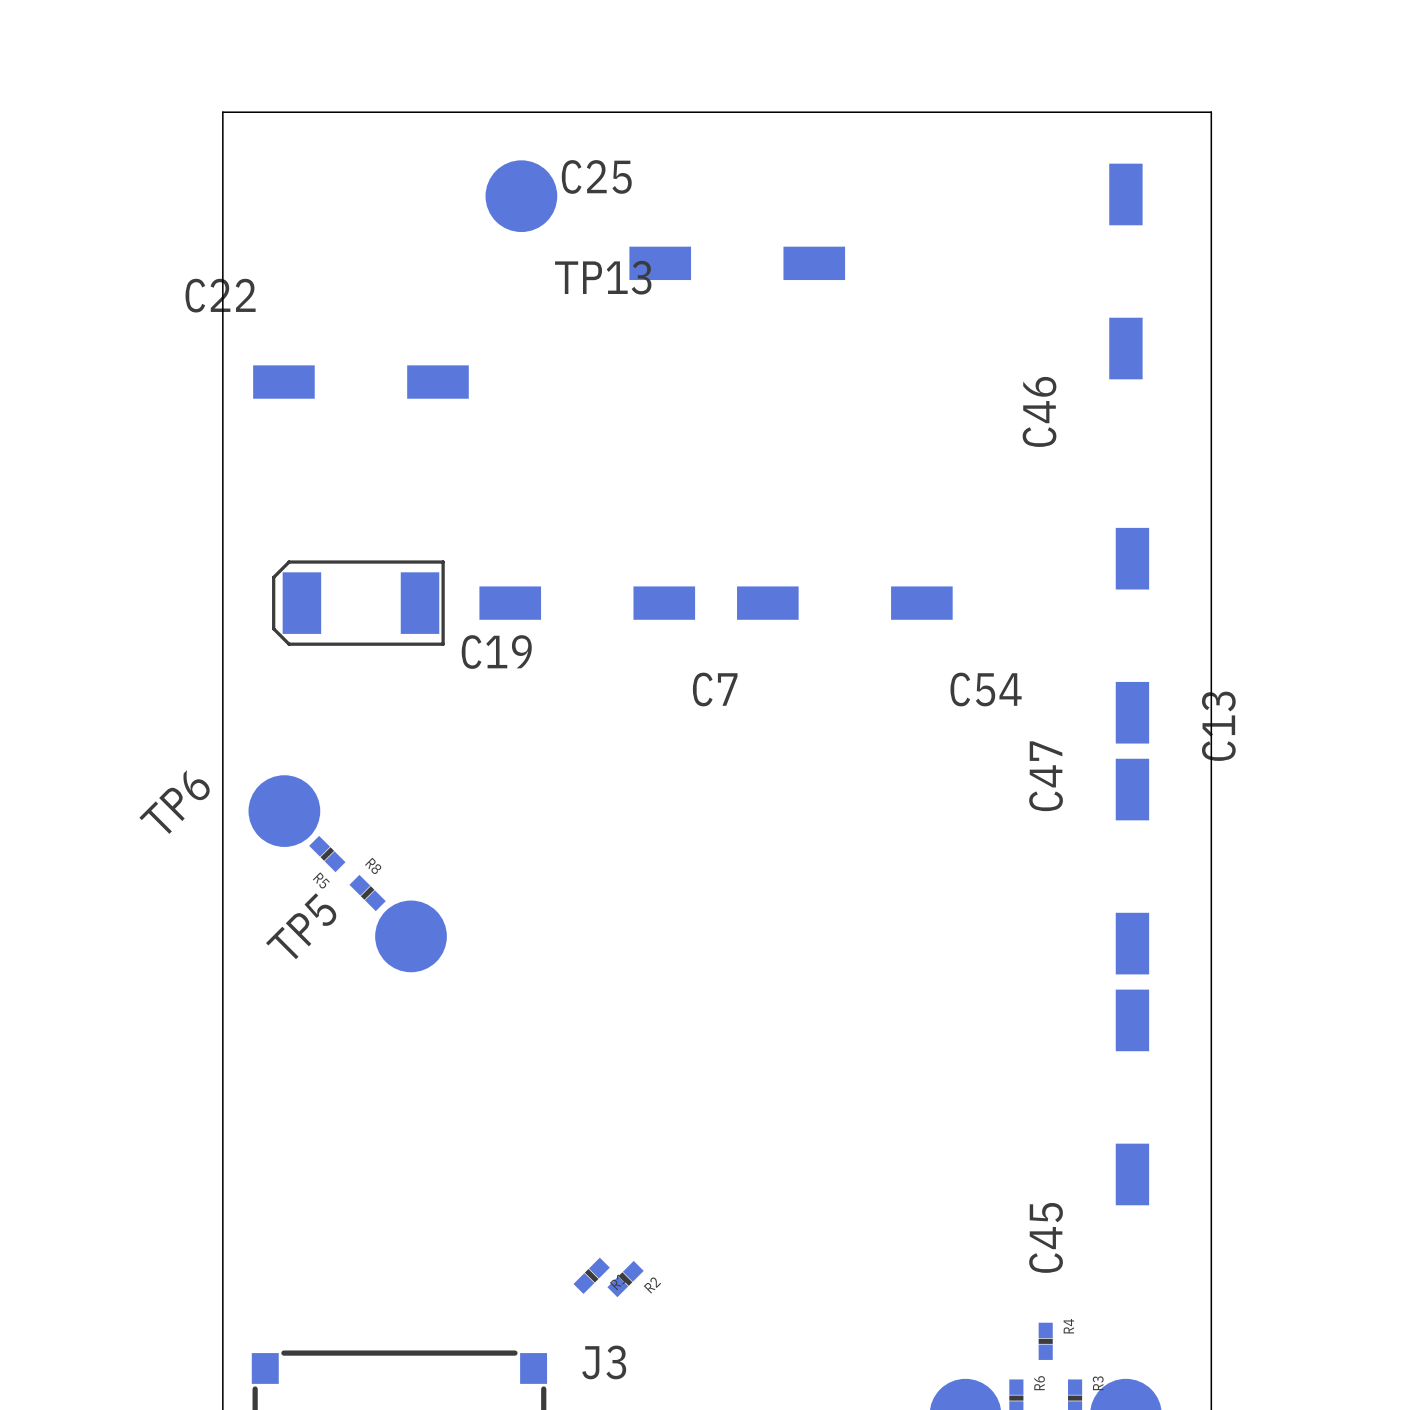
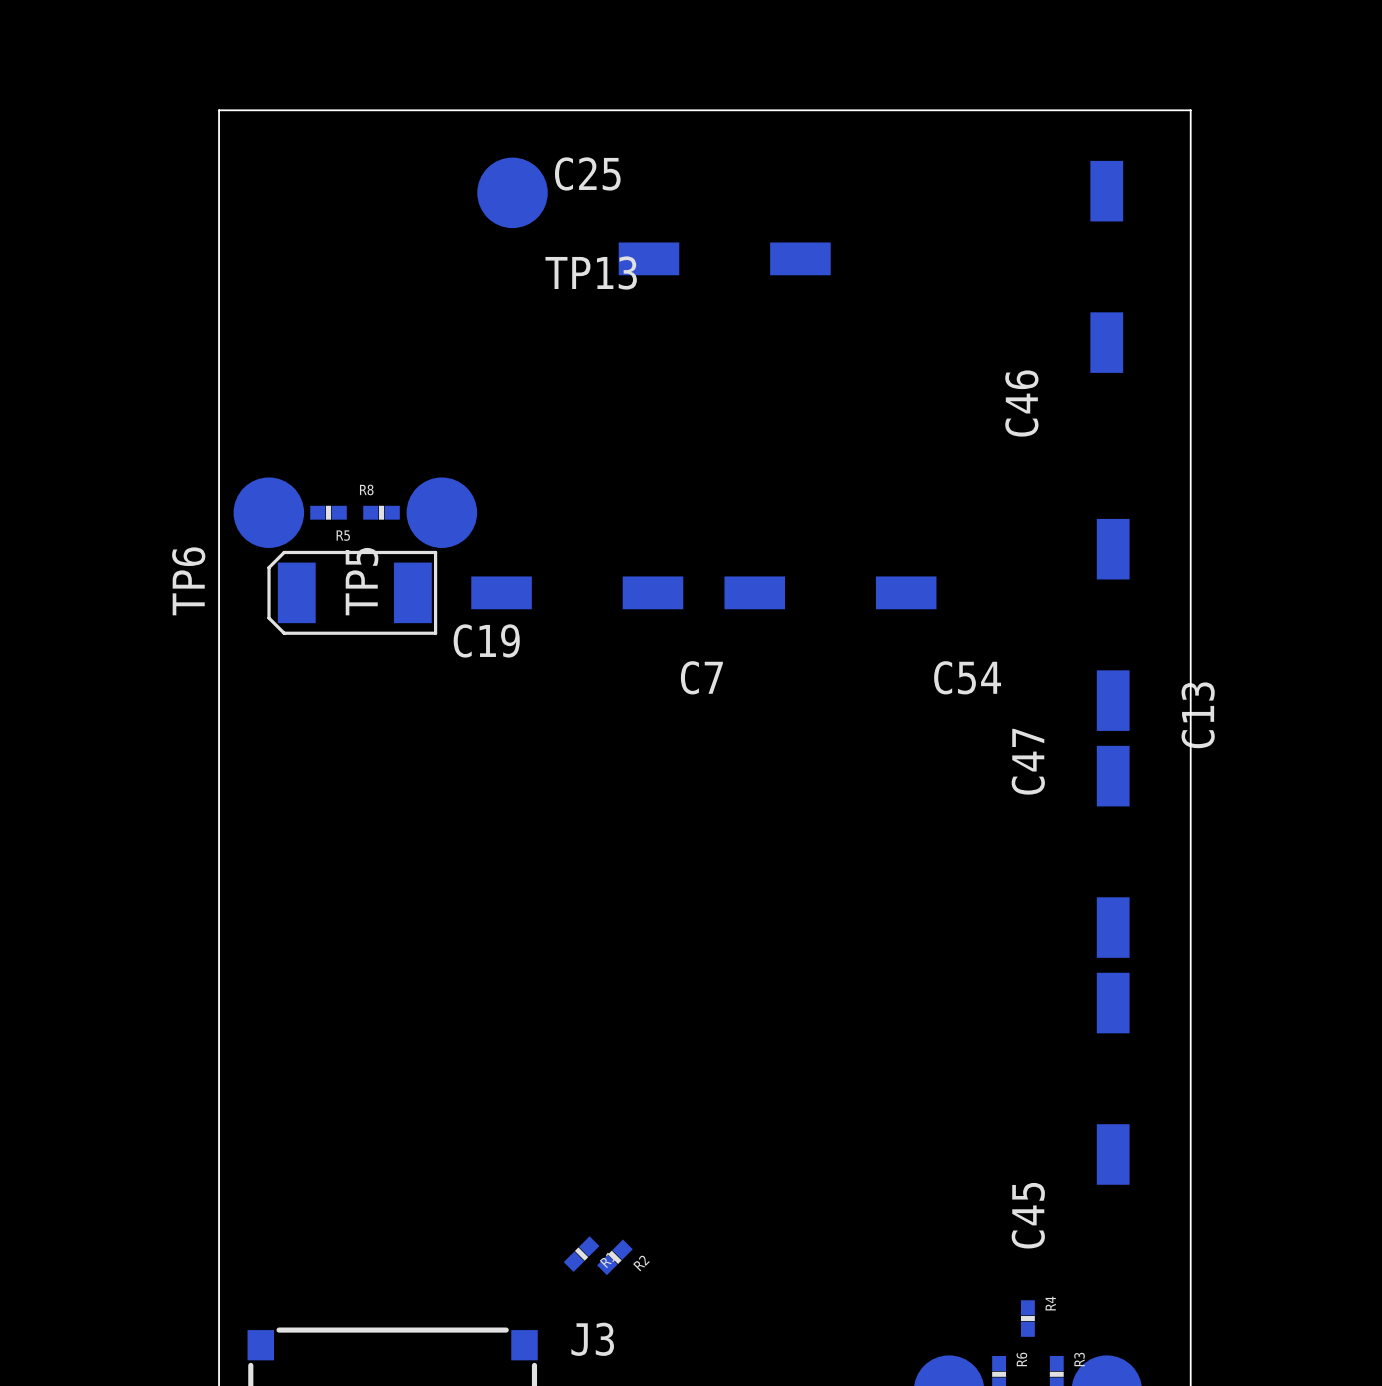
C22: (360, 382) -> none
TP6 name rotation: 0° (174, 802) -> 45° counterclockwise (188, 581)
TP6 position: (284, 811) -> (268, 512)
R5 rotation: 0° (327, 854) -> 45° counterclockwise (328, 512)
R5 position: (327, 854) -> (328, 512)
R8 rotation: 0° (367, 893) -> 45° counterclockwise (381, 512)
R8 position: (367, 893) -> (381, 512)
TP5 name rotation: 0° (301, 926) -> 45° counterclockwise (362, 581)
TP5 position: (411, 936) -> (441, 512)

